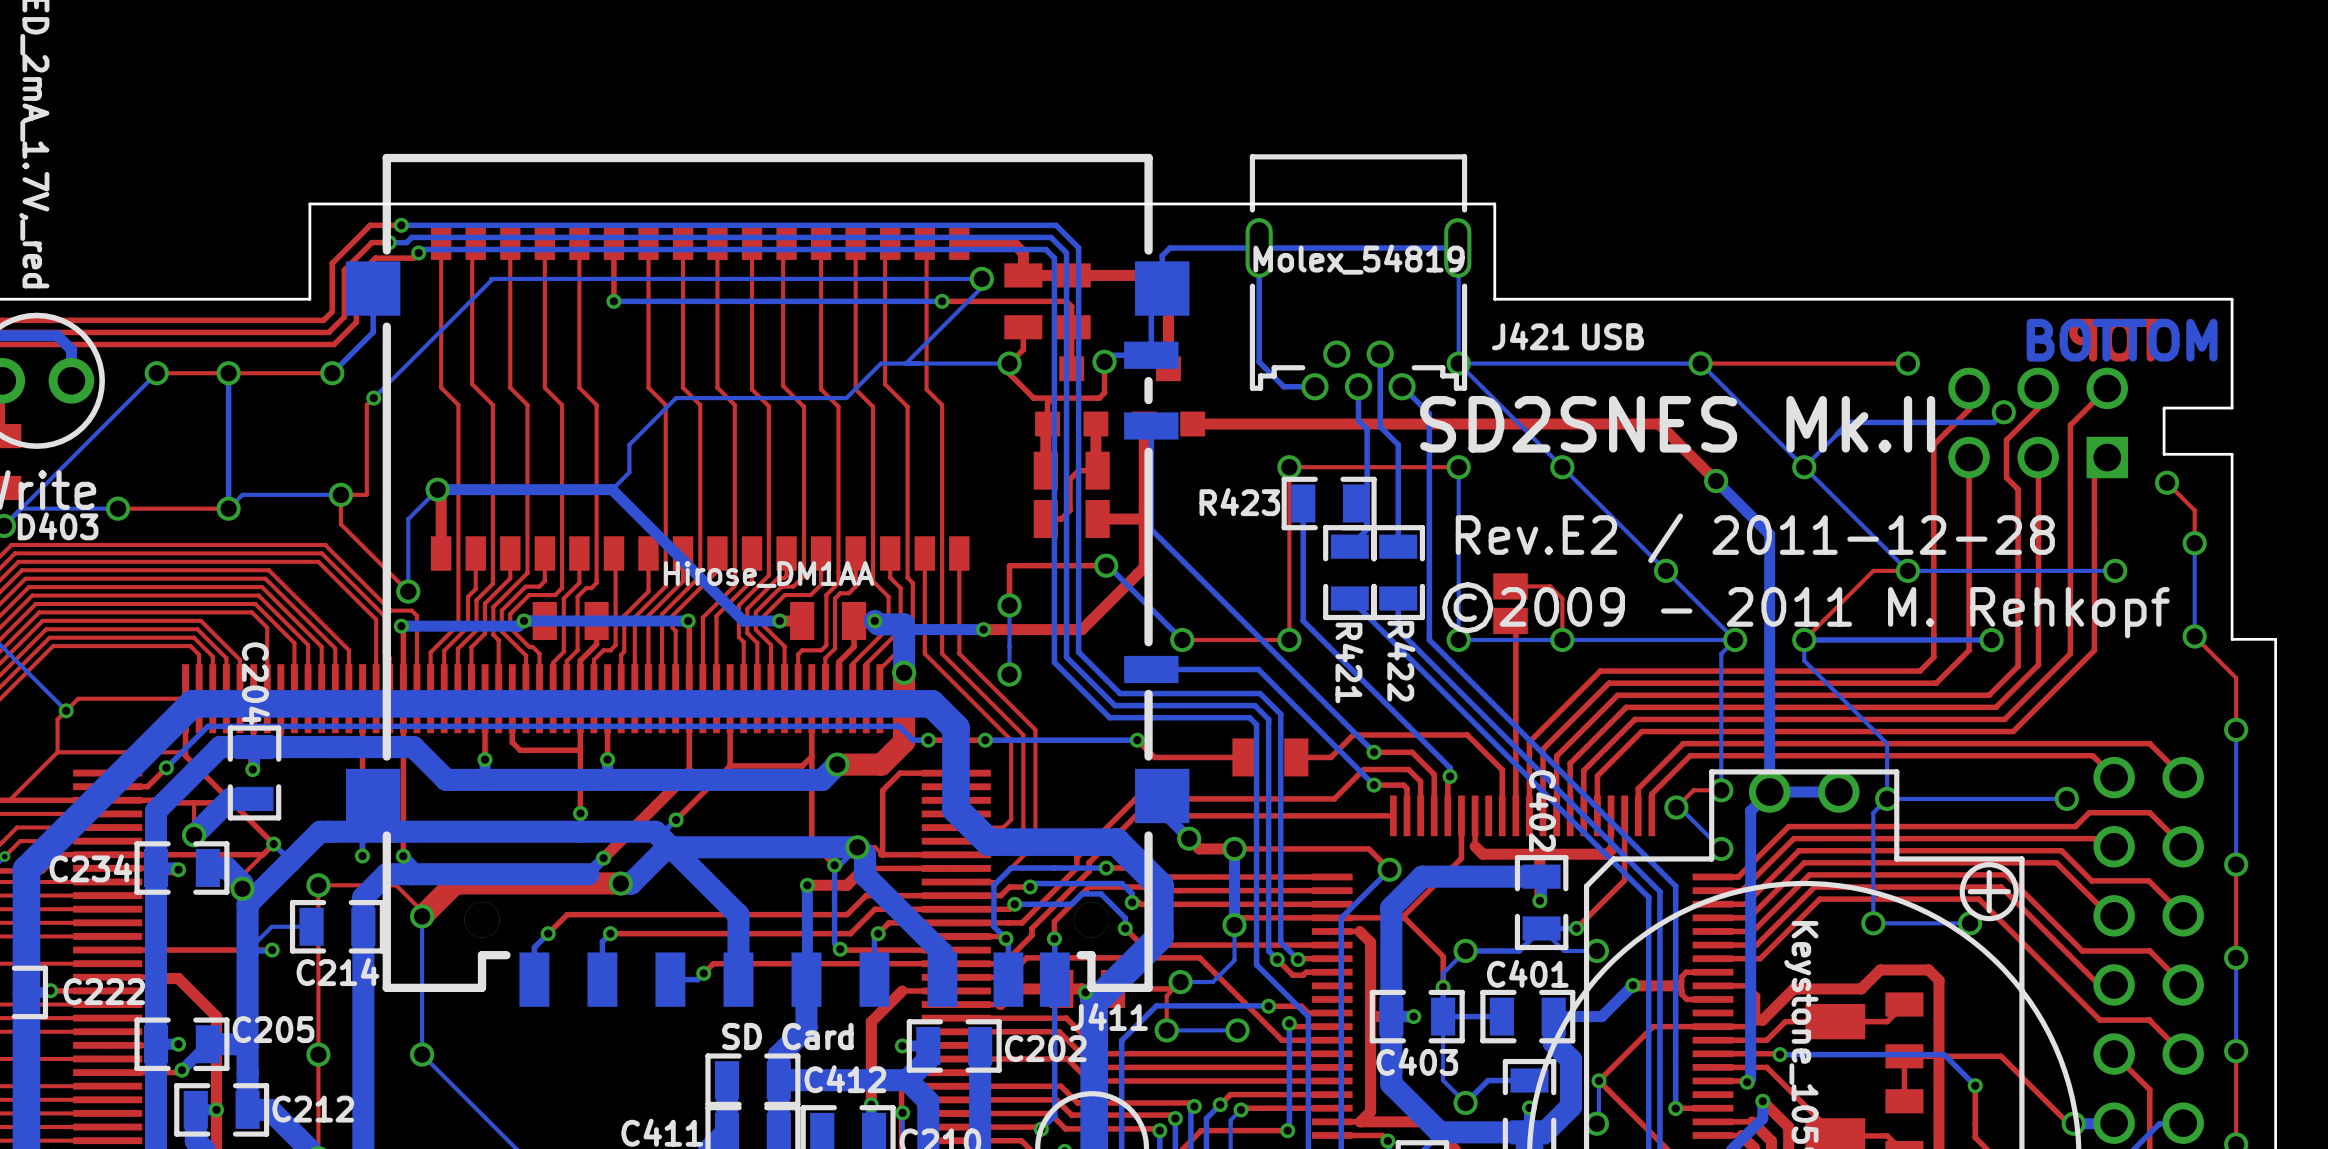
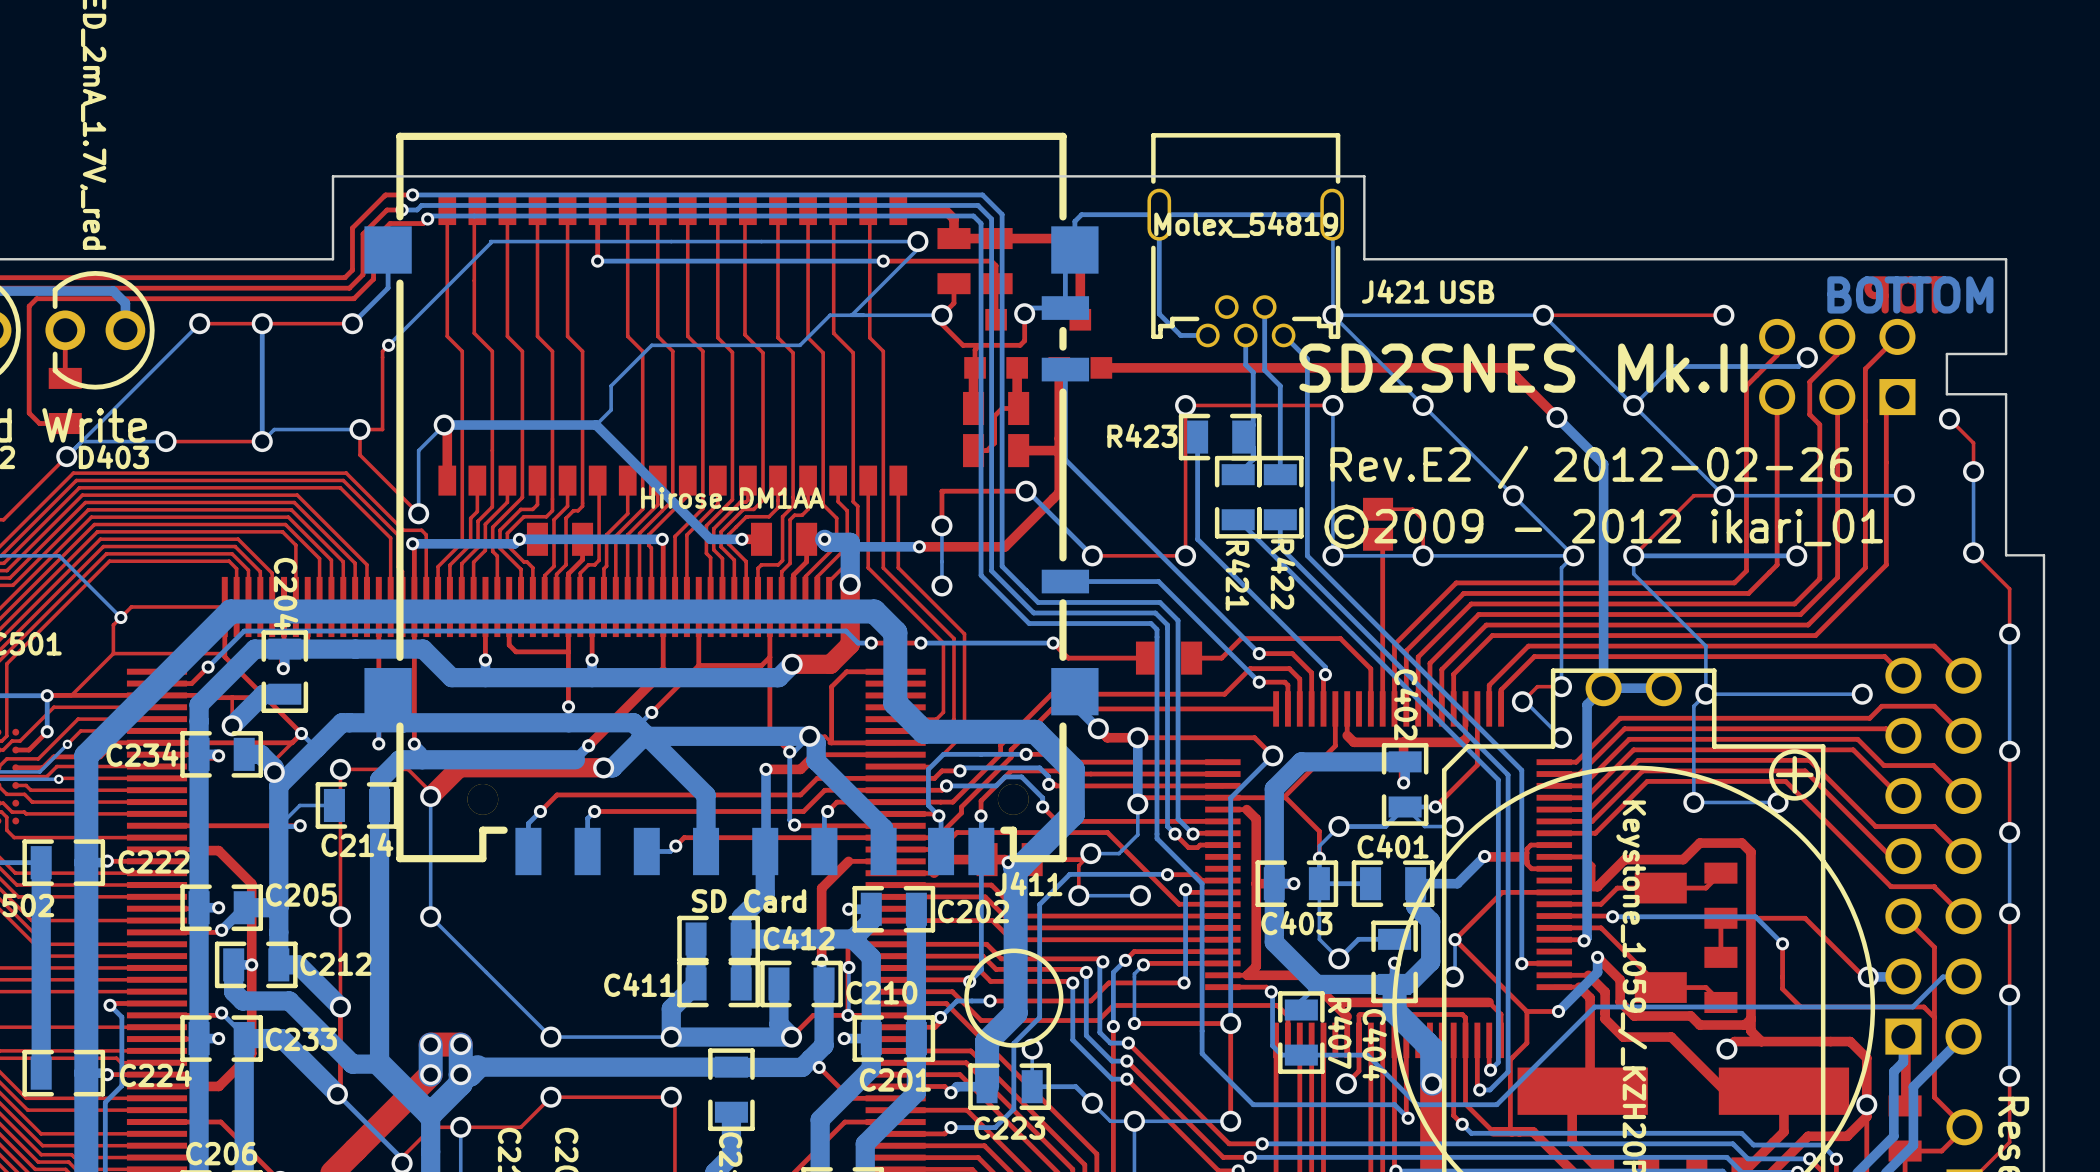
text: Rev.E2 / 2011-12-28 (1755, 538) -> Rev.E2 / 2012-02-26 (1591, 467)
text: none -> ©2009 - 2012 ikari_01 (1603, 526)
text: ©2009 - 2011 M. Rehkopf (1805, 610) -> none

